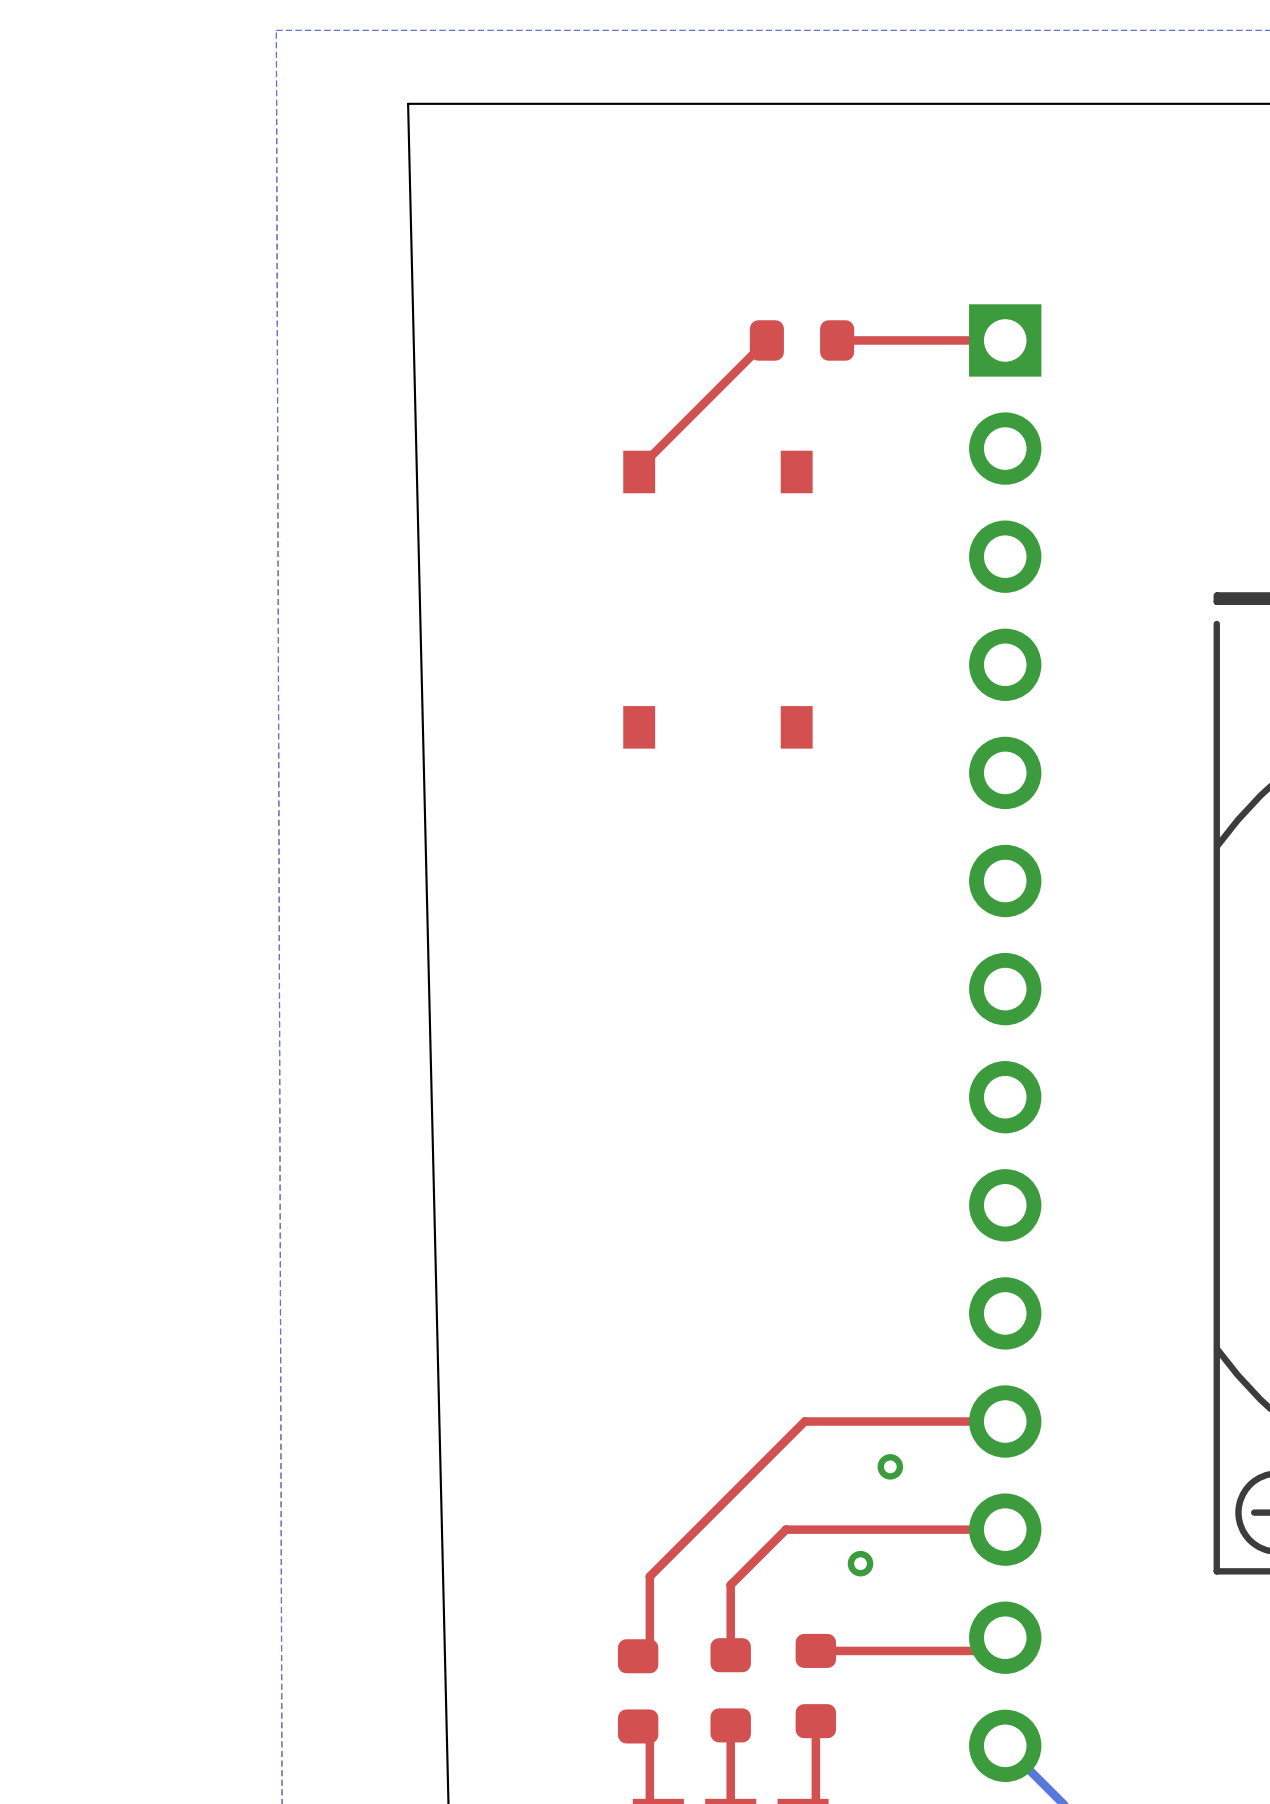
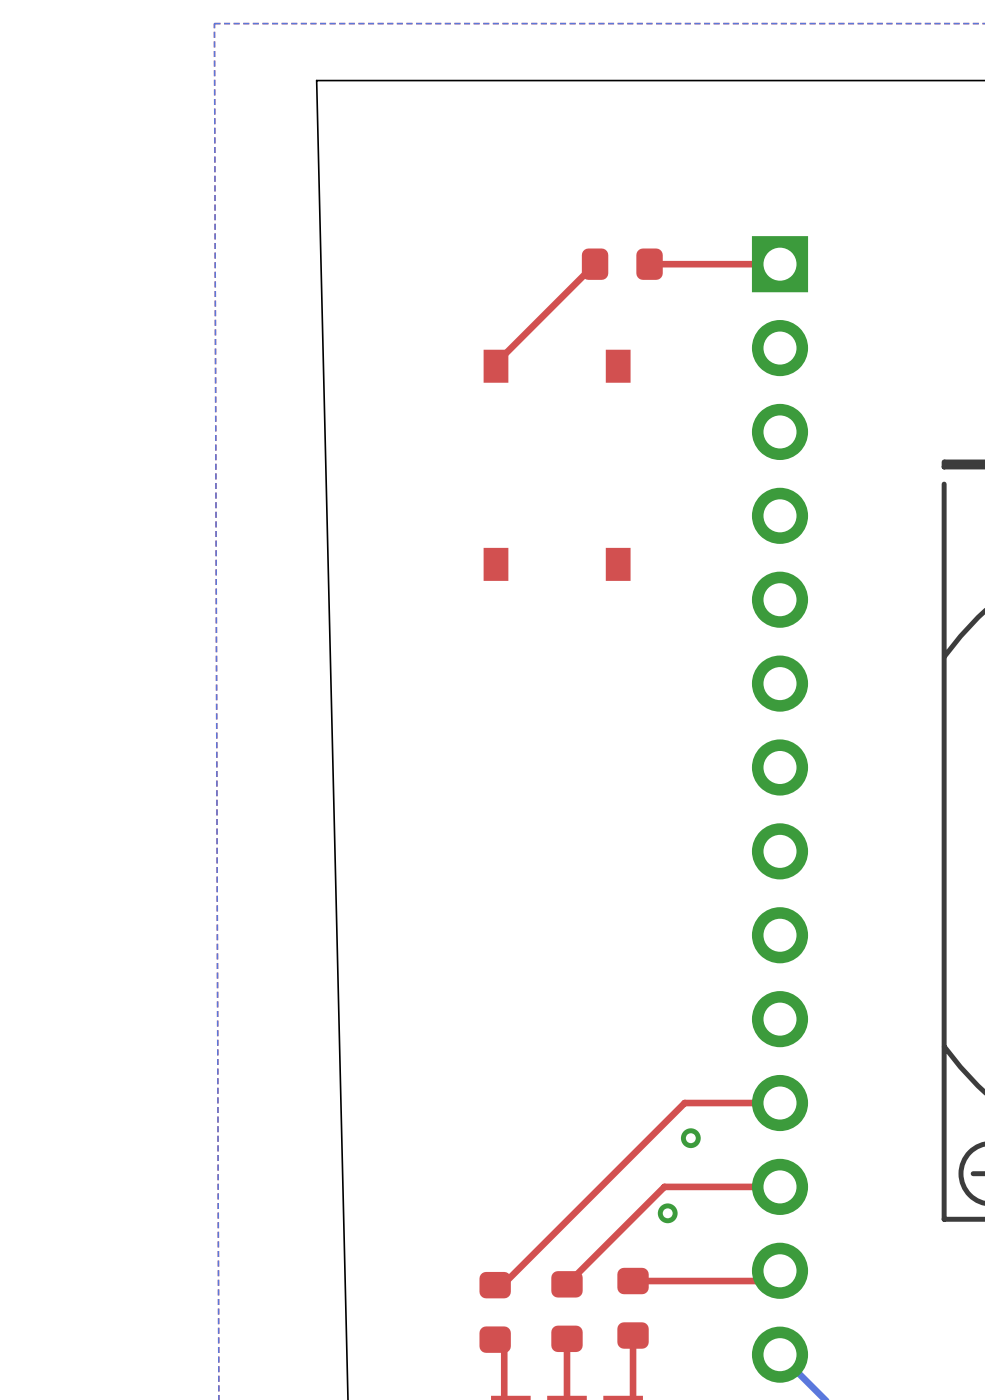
top track: (882, 1421) (804, 1421) (649, 1576) (649, 1654) -> (684, 1103) (504, 1283)
top track: (856, 1529) (786, 1529) (730, 1584) (730, 1655) -> (664, 1186) (566, 1284)

